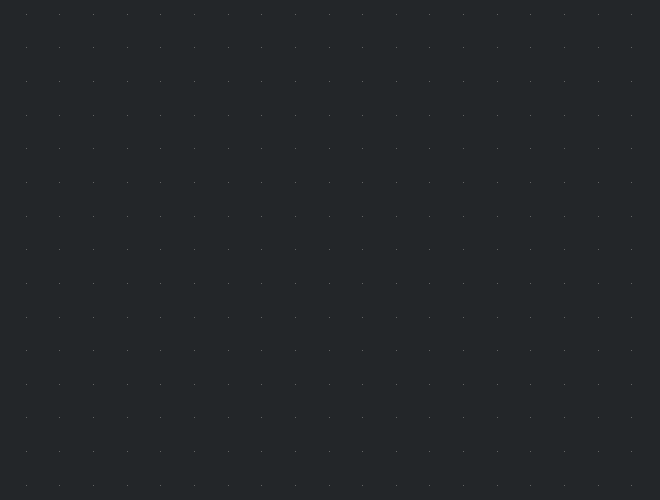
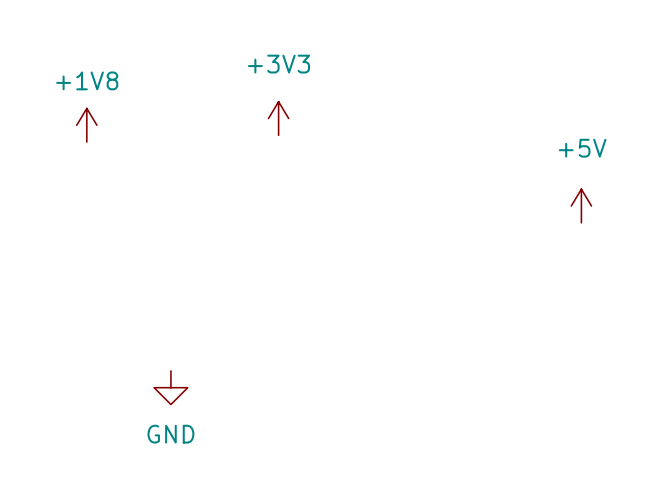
power symbol: none -> +3V3 (278, 118)
power symbol: none -> +1V8 (86, 125)
power symbol: none -> +5V (581, 206)
power symbol: none -> GND (170, 387)

